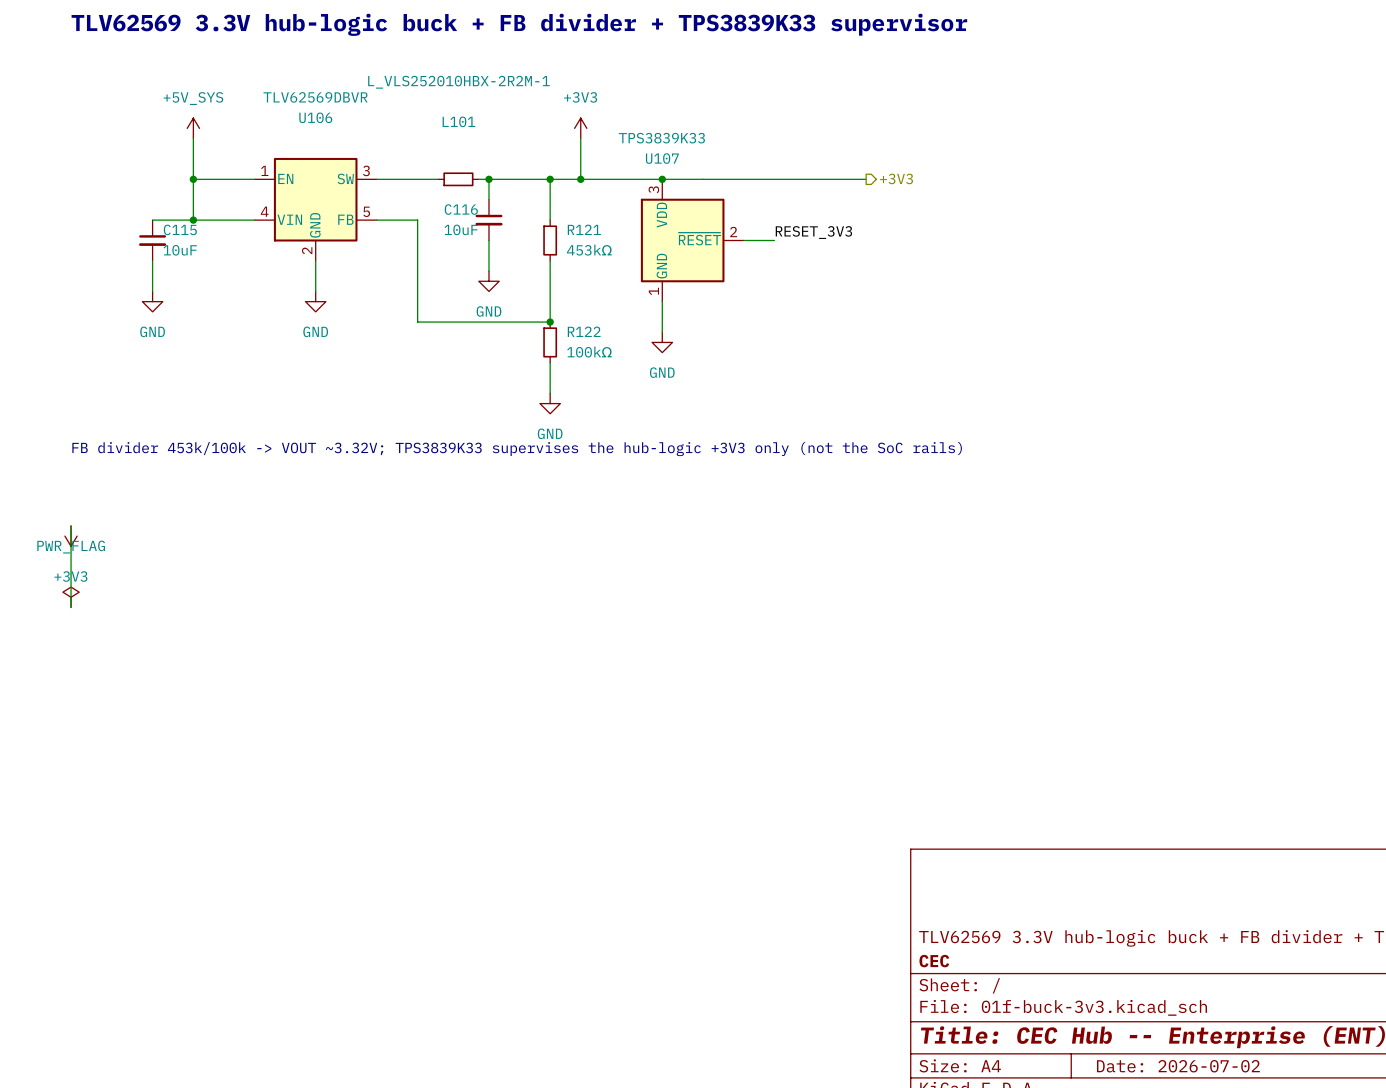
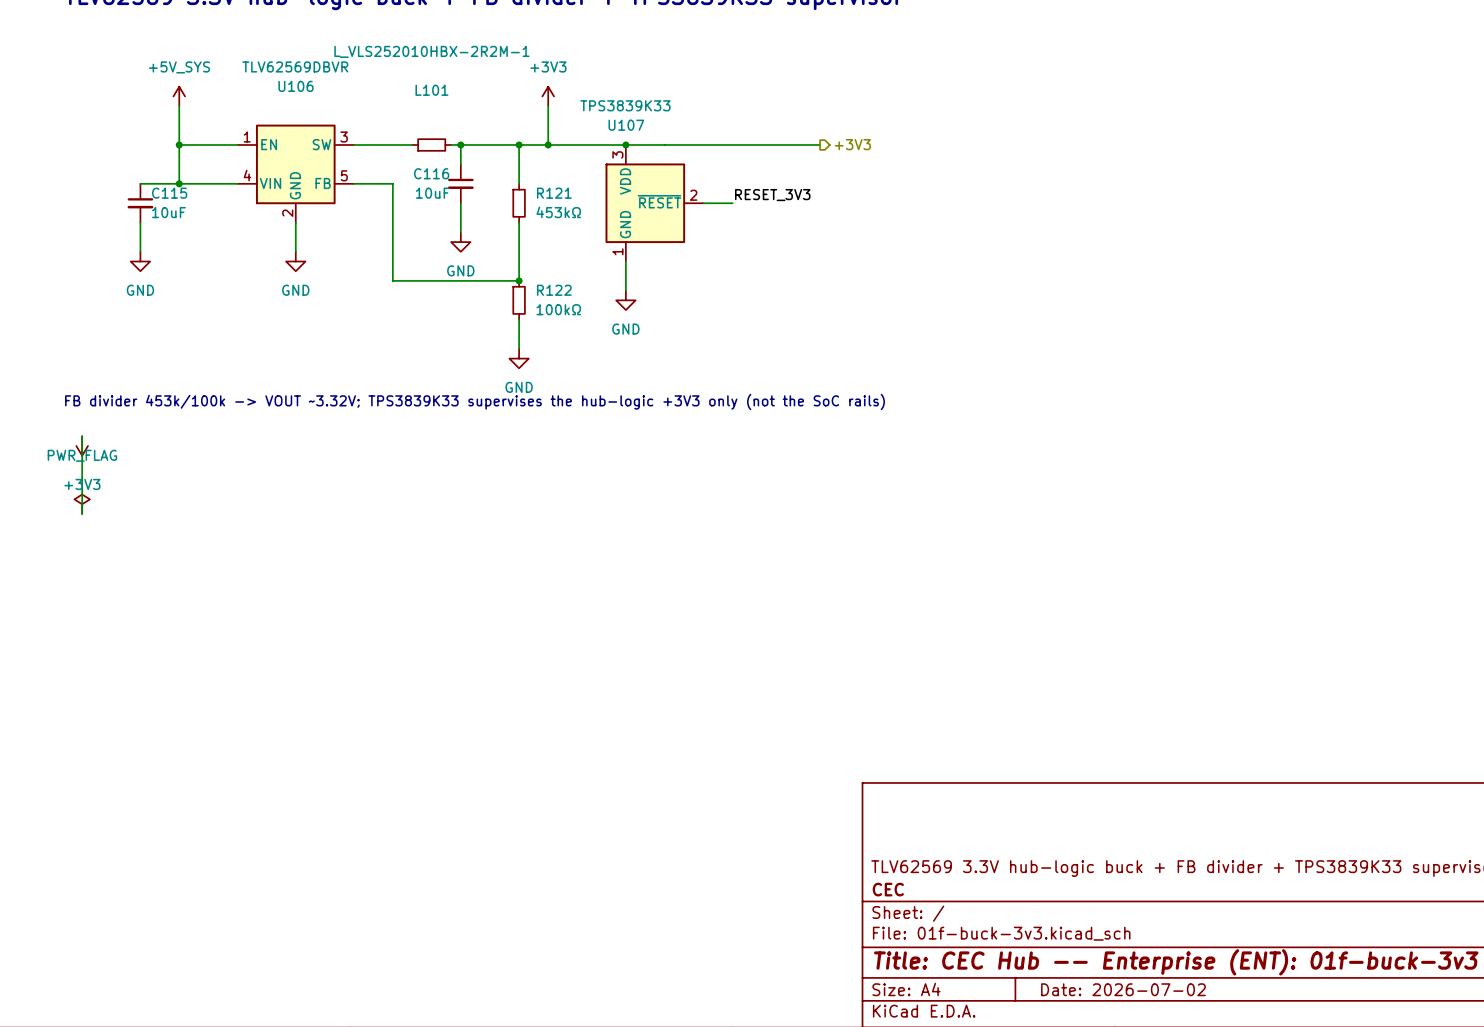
wire: (71, 525) (71, 607) -> (82, 436) (82, 513)
power symbol position: +3V3 (71, 536) -> +3V3 (82, 445)
power symbol position: PWR_FLAG (71, 597) -> PWR_FLAG (82, 504)

